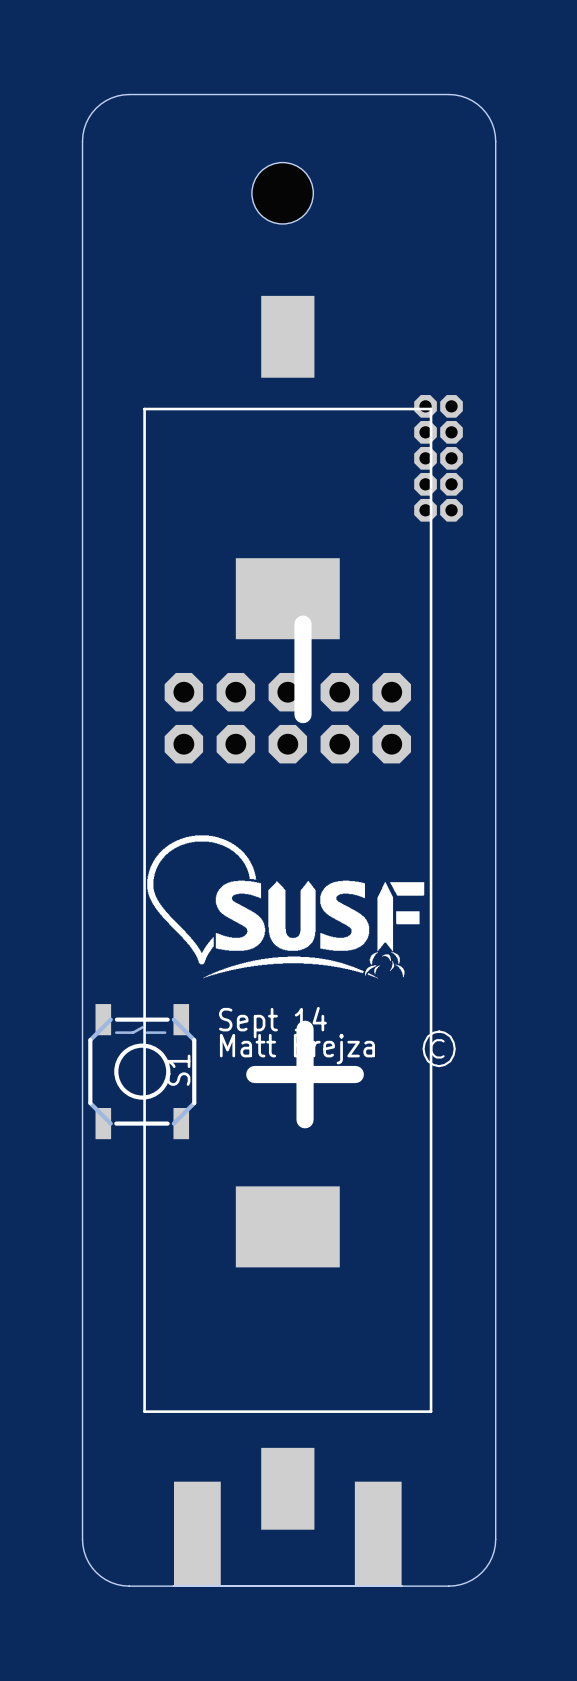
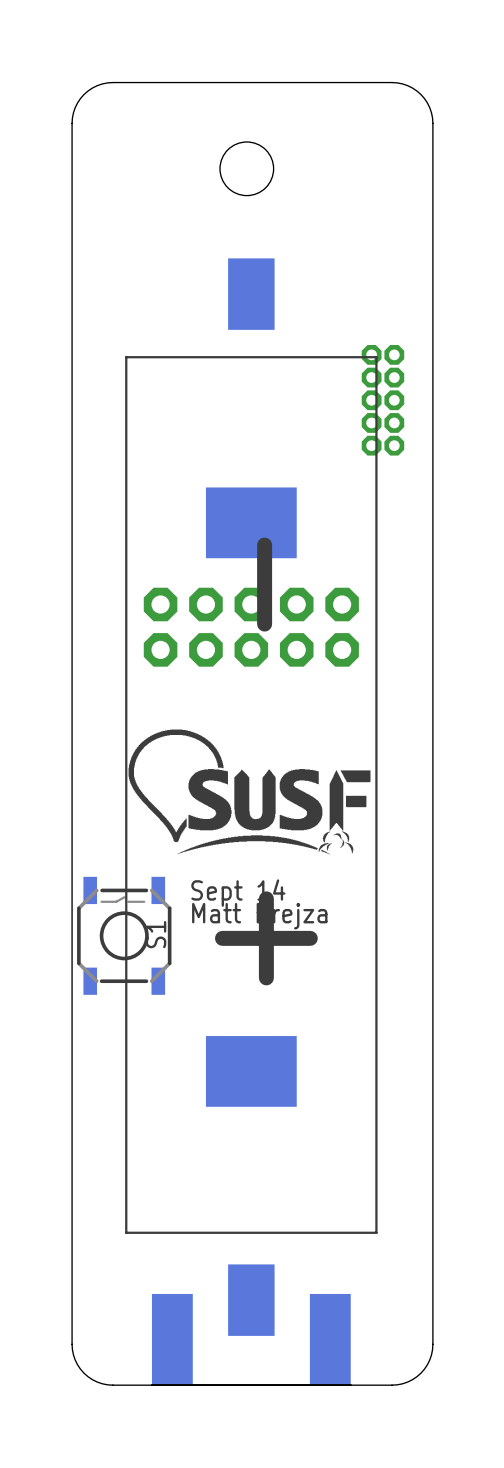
text: © (439, 1048) -> none

